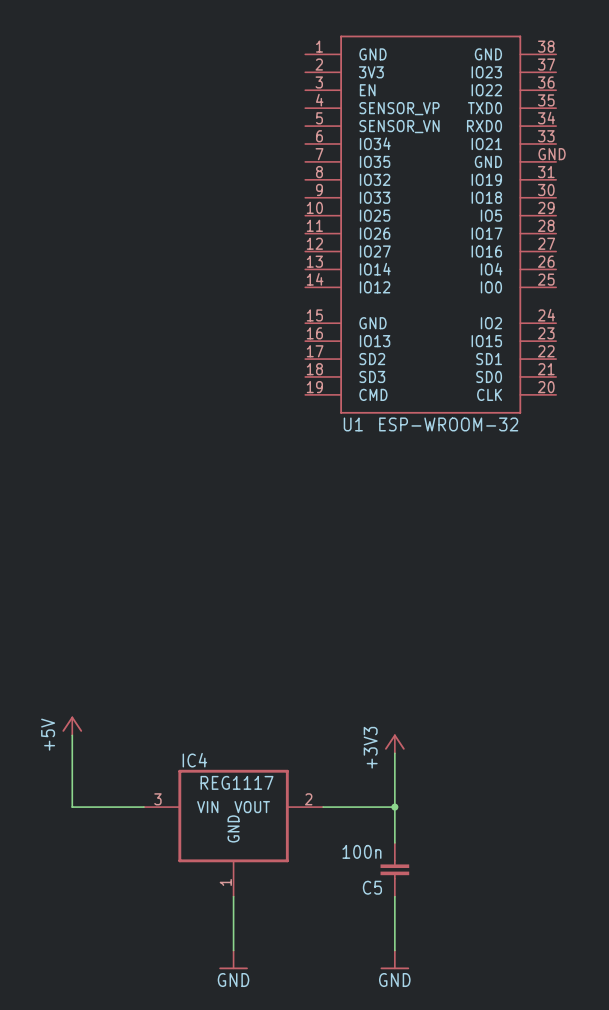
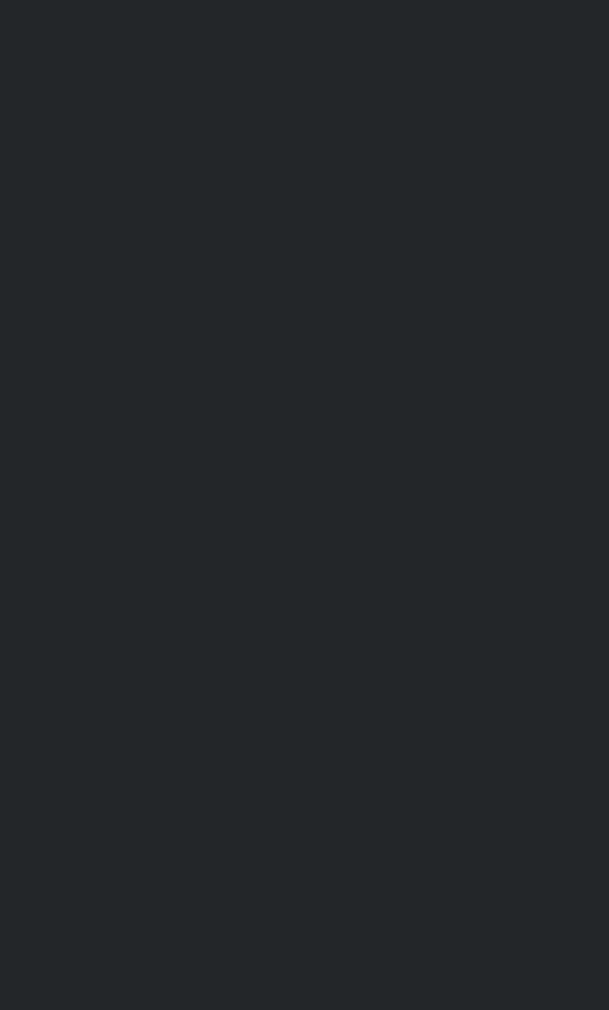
U1: ESP-WROOM-32 (430, 224) -> none
power symbol: +5V (72, 725) -> none
wire: (72, 735) (72, 807) (143, 807) -> none
power symbol: +3V3 (394, 743) -> none
wire: (394, 753) (394, 842) -> none
wire: (323, 807) (394, 807) -> none
junction: (394, 807) -> none
IC4: REG1117 (233, 833) -> none
C5: 100n (394, 869) -> none
wire: (233, 896) (233, 950) -> none
wire: (394, 896) (394, 950) -> none
power symbol: GND (233, 959) -> none
power symbol: GND (394, 959) -> none

